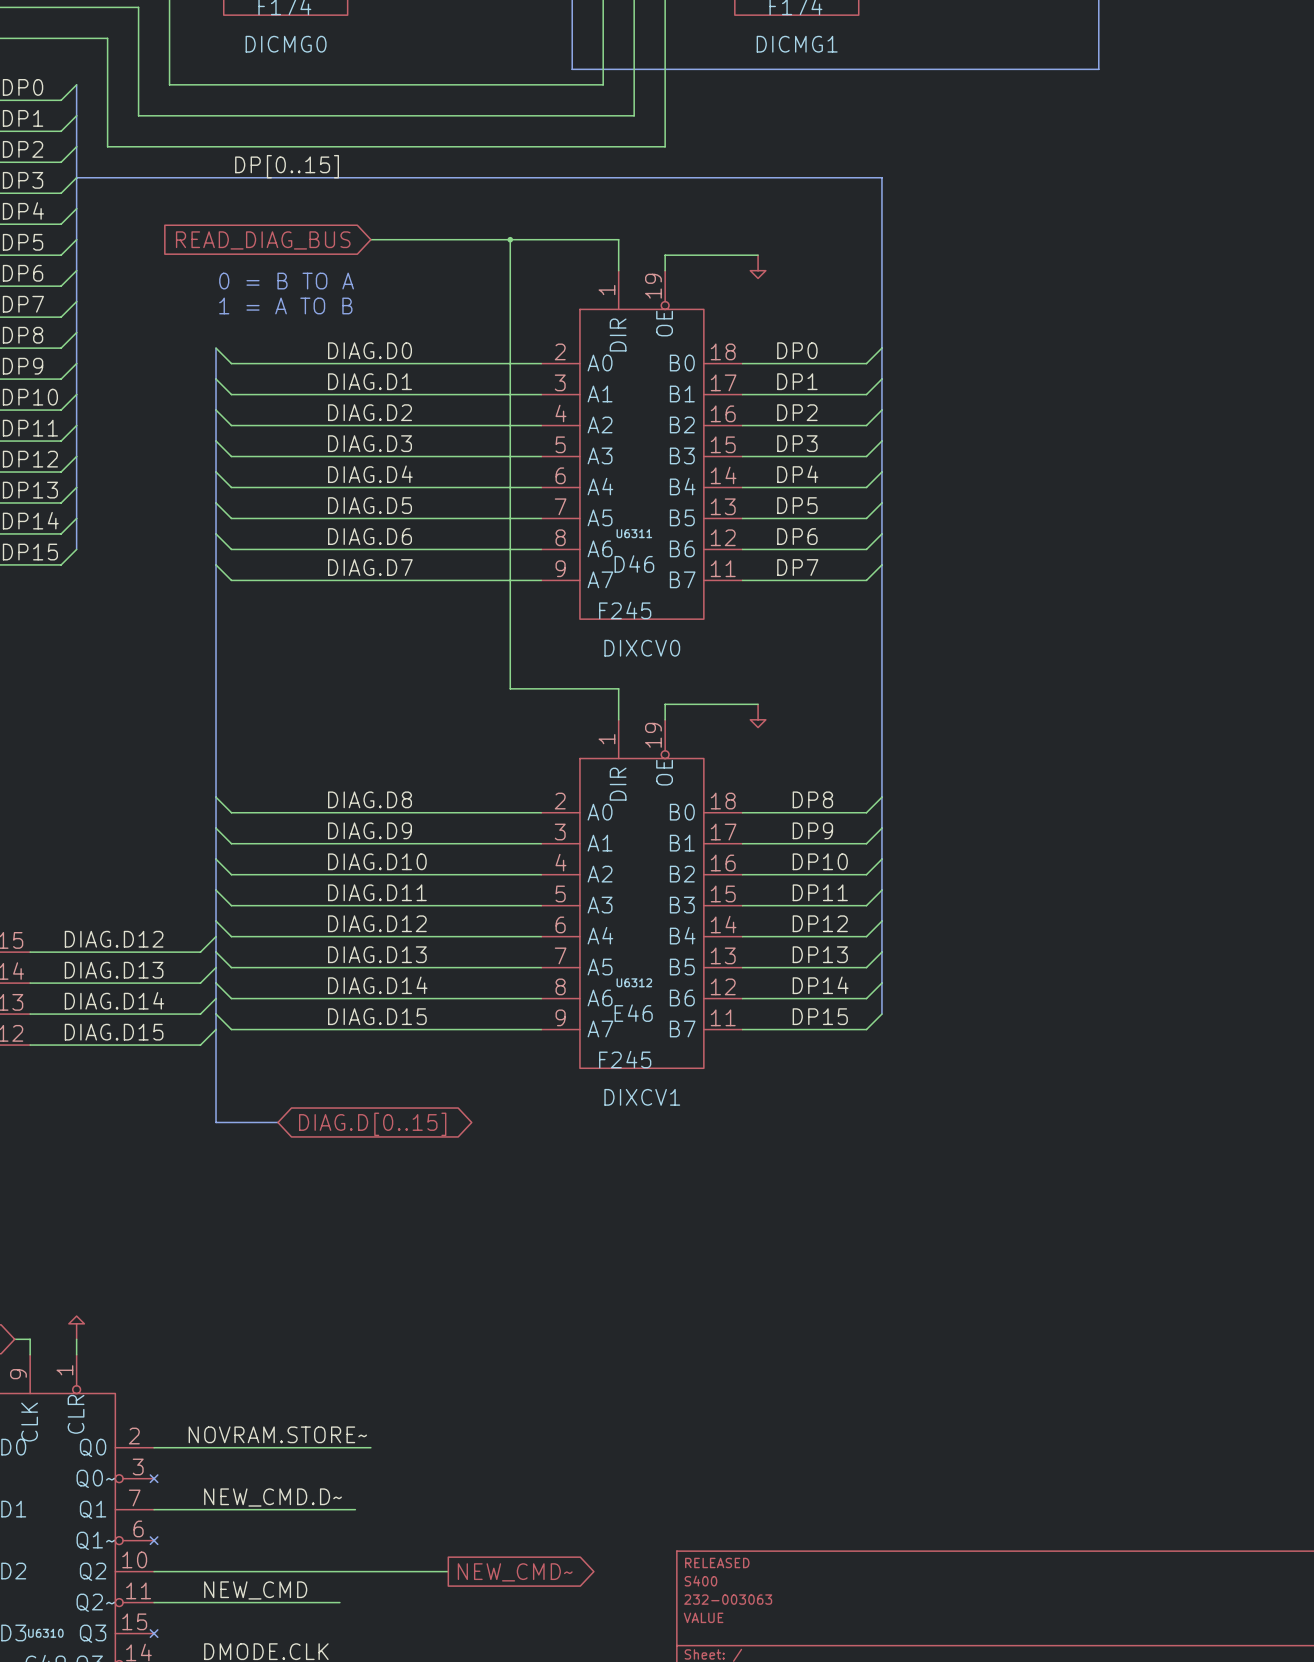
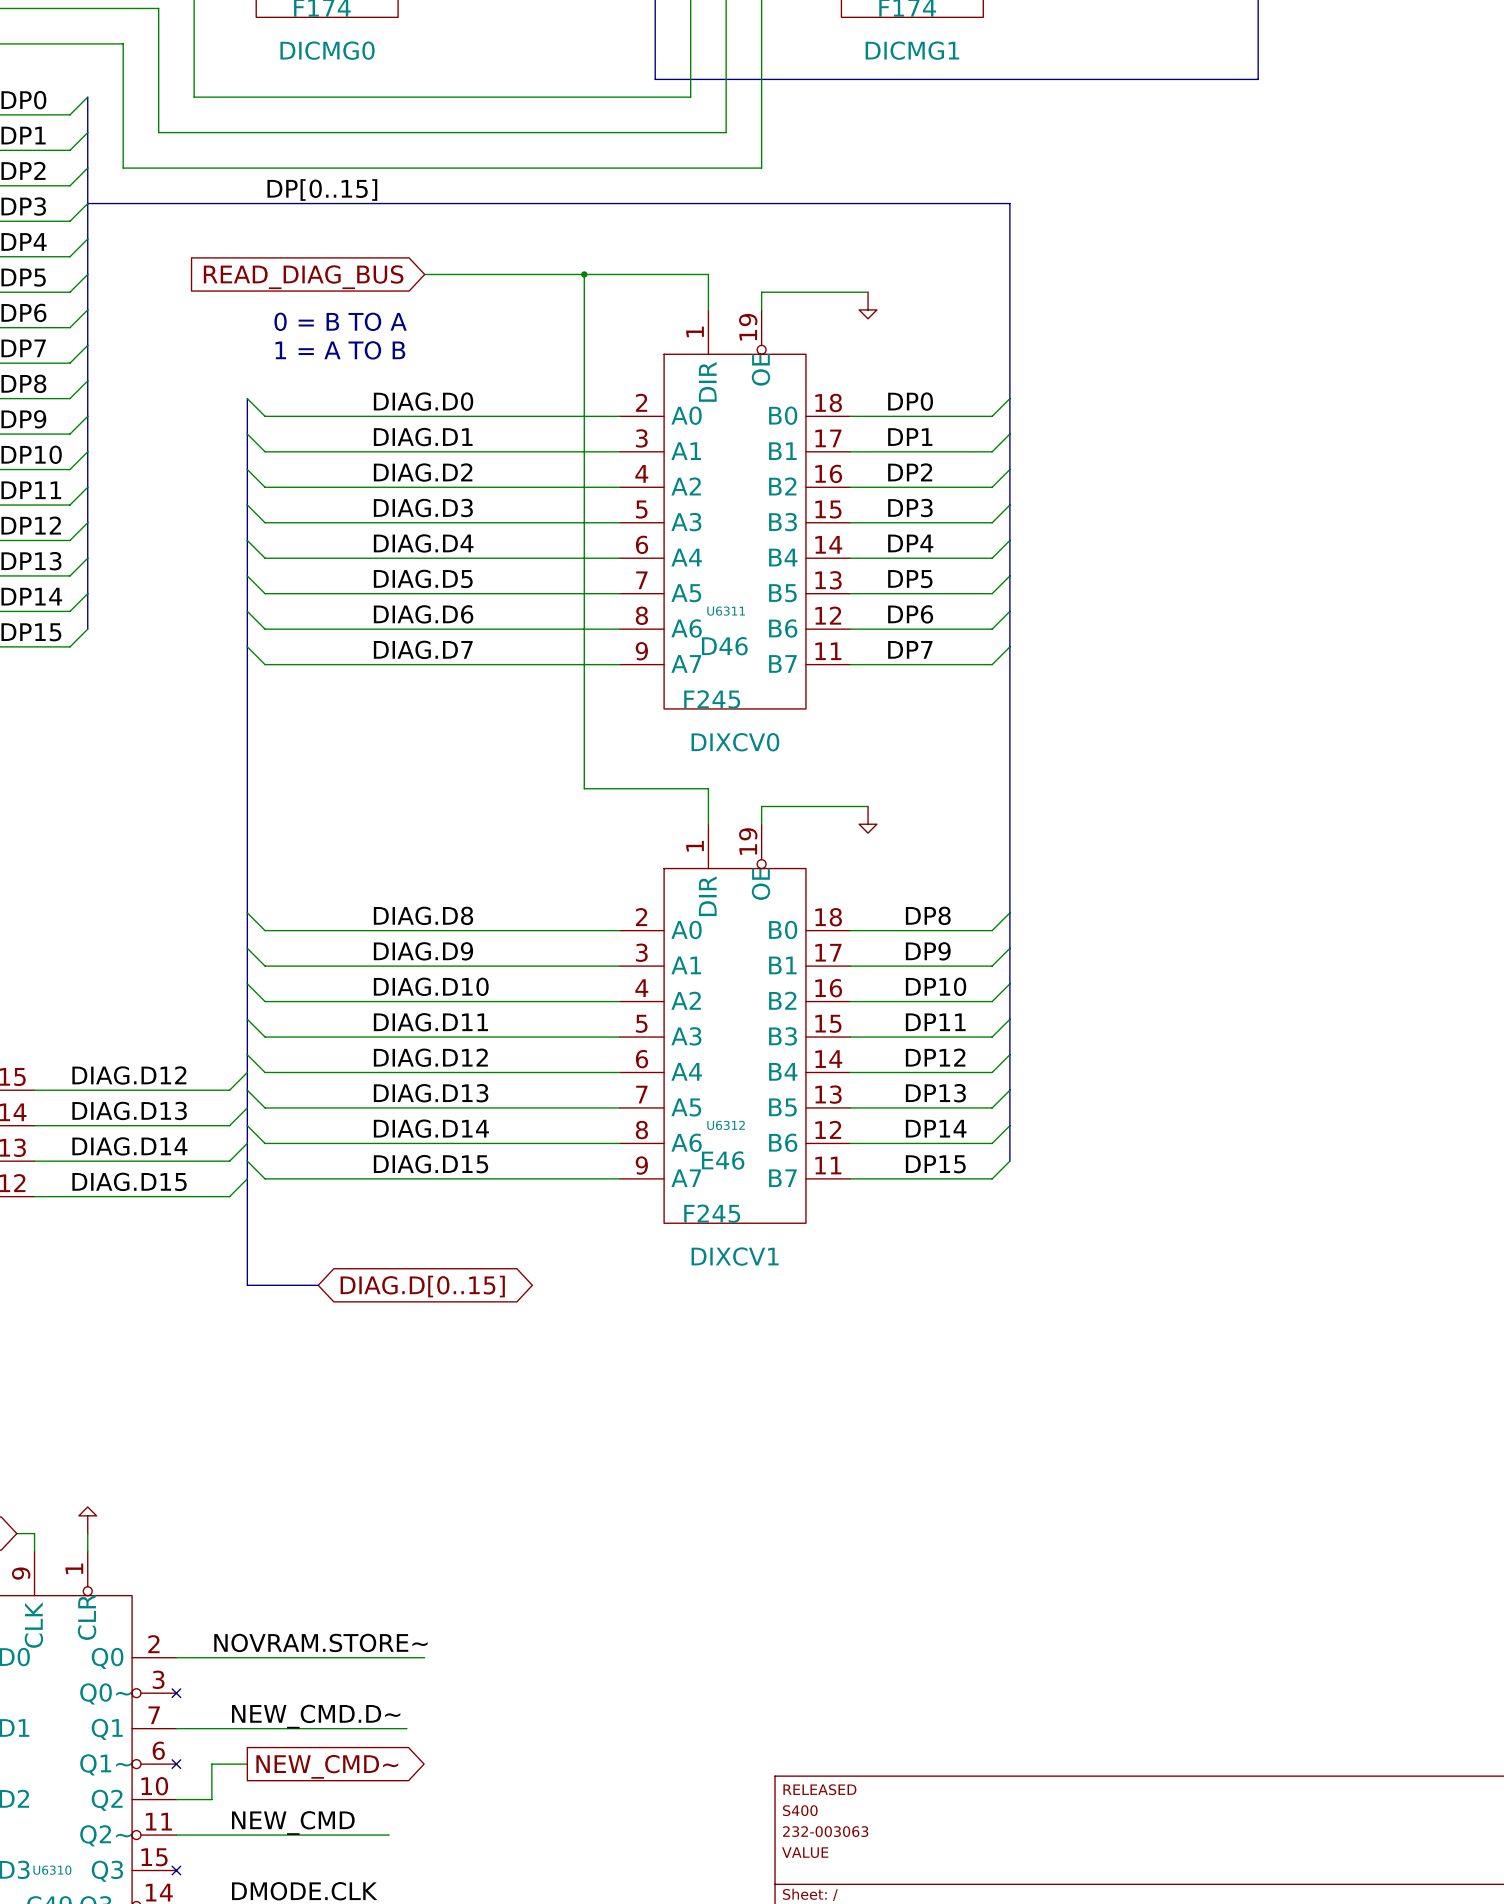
global label: none -> NEW_CMD~ (327, 1766)
wire: (185, 1571) (448, 1571) -> (211, 1799) (211, 1764) (247, 1764)
global label: NEW_CMD~ (515, 1572) -> none

